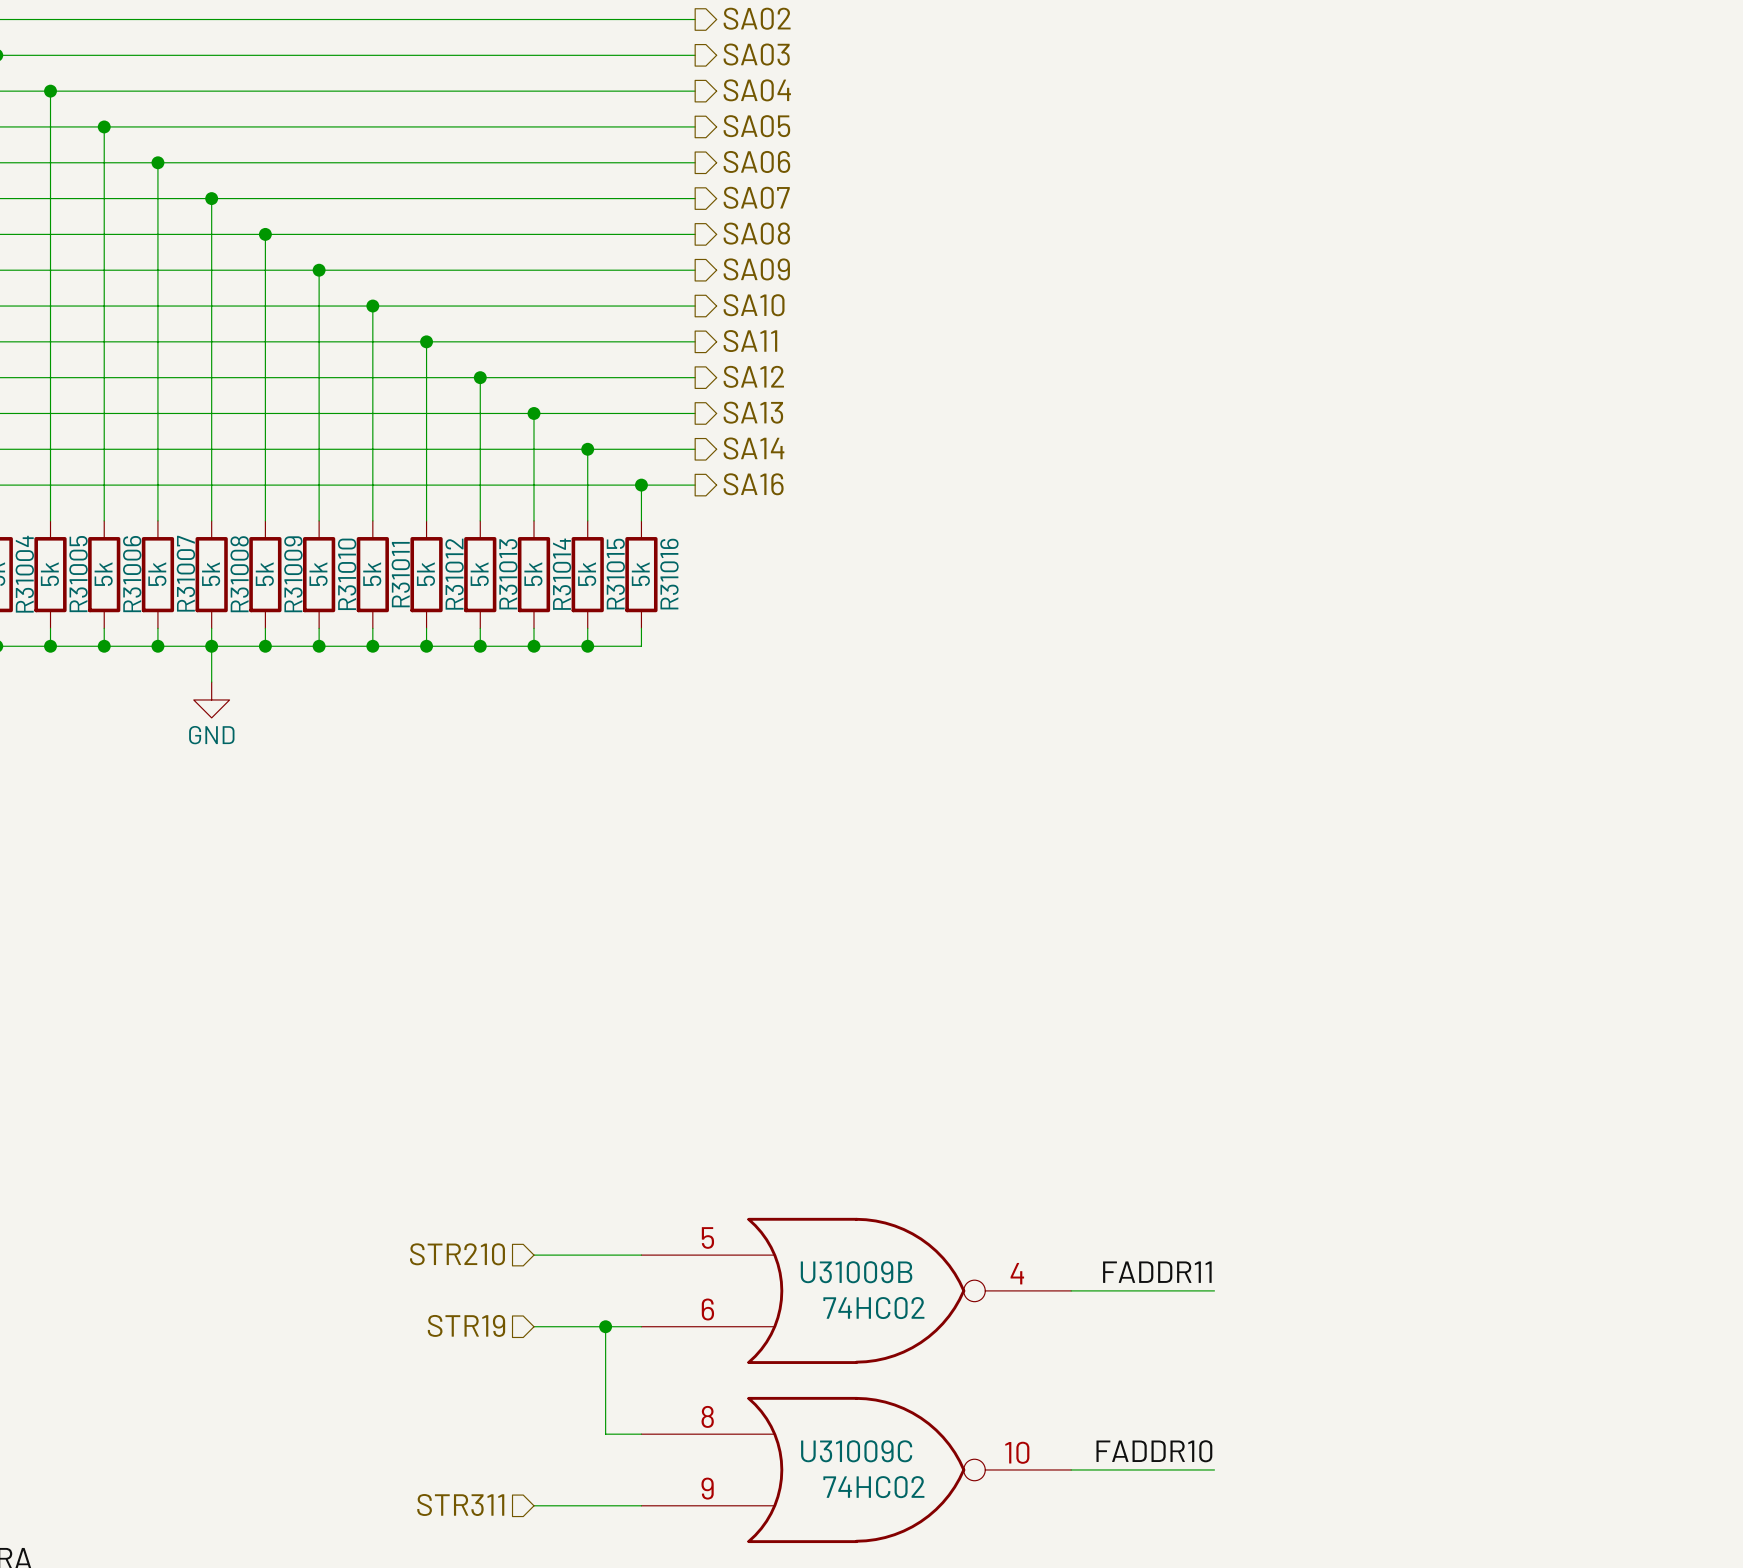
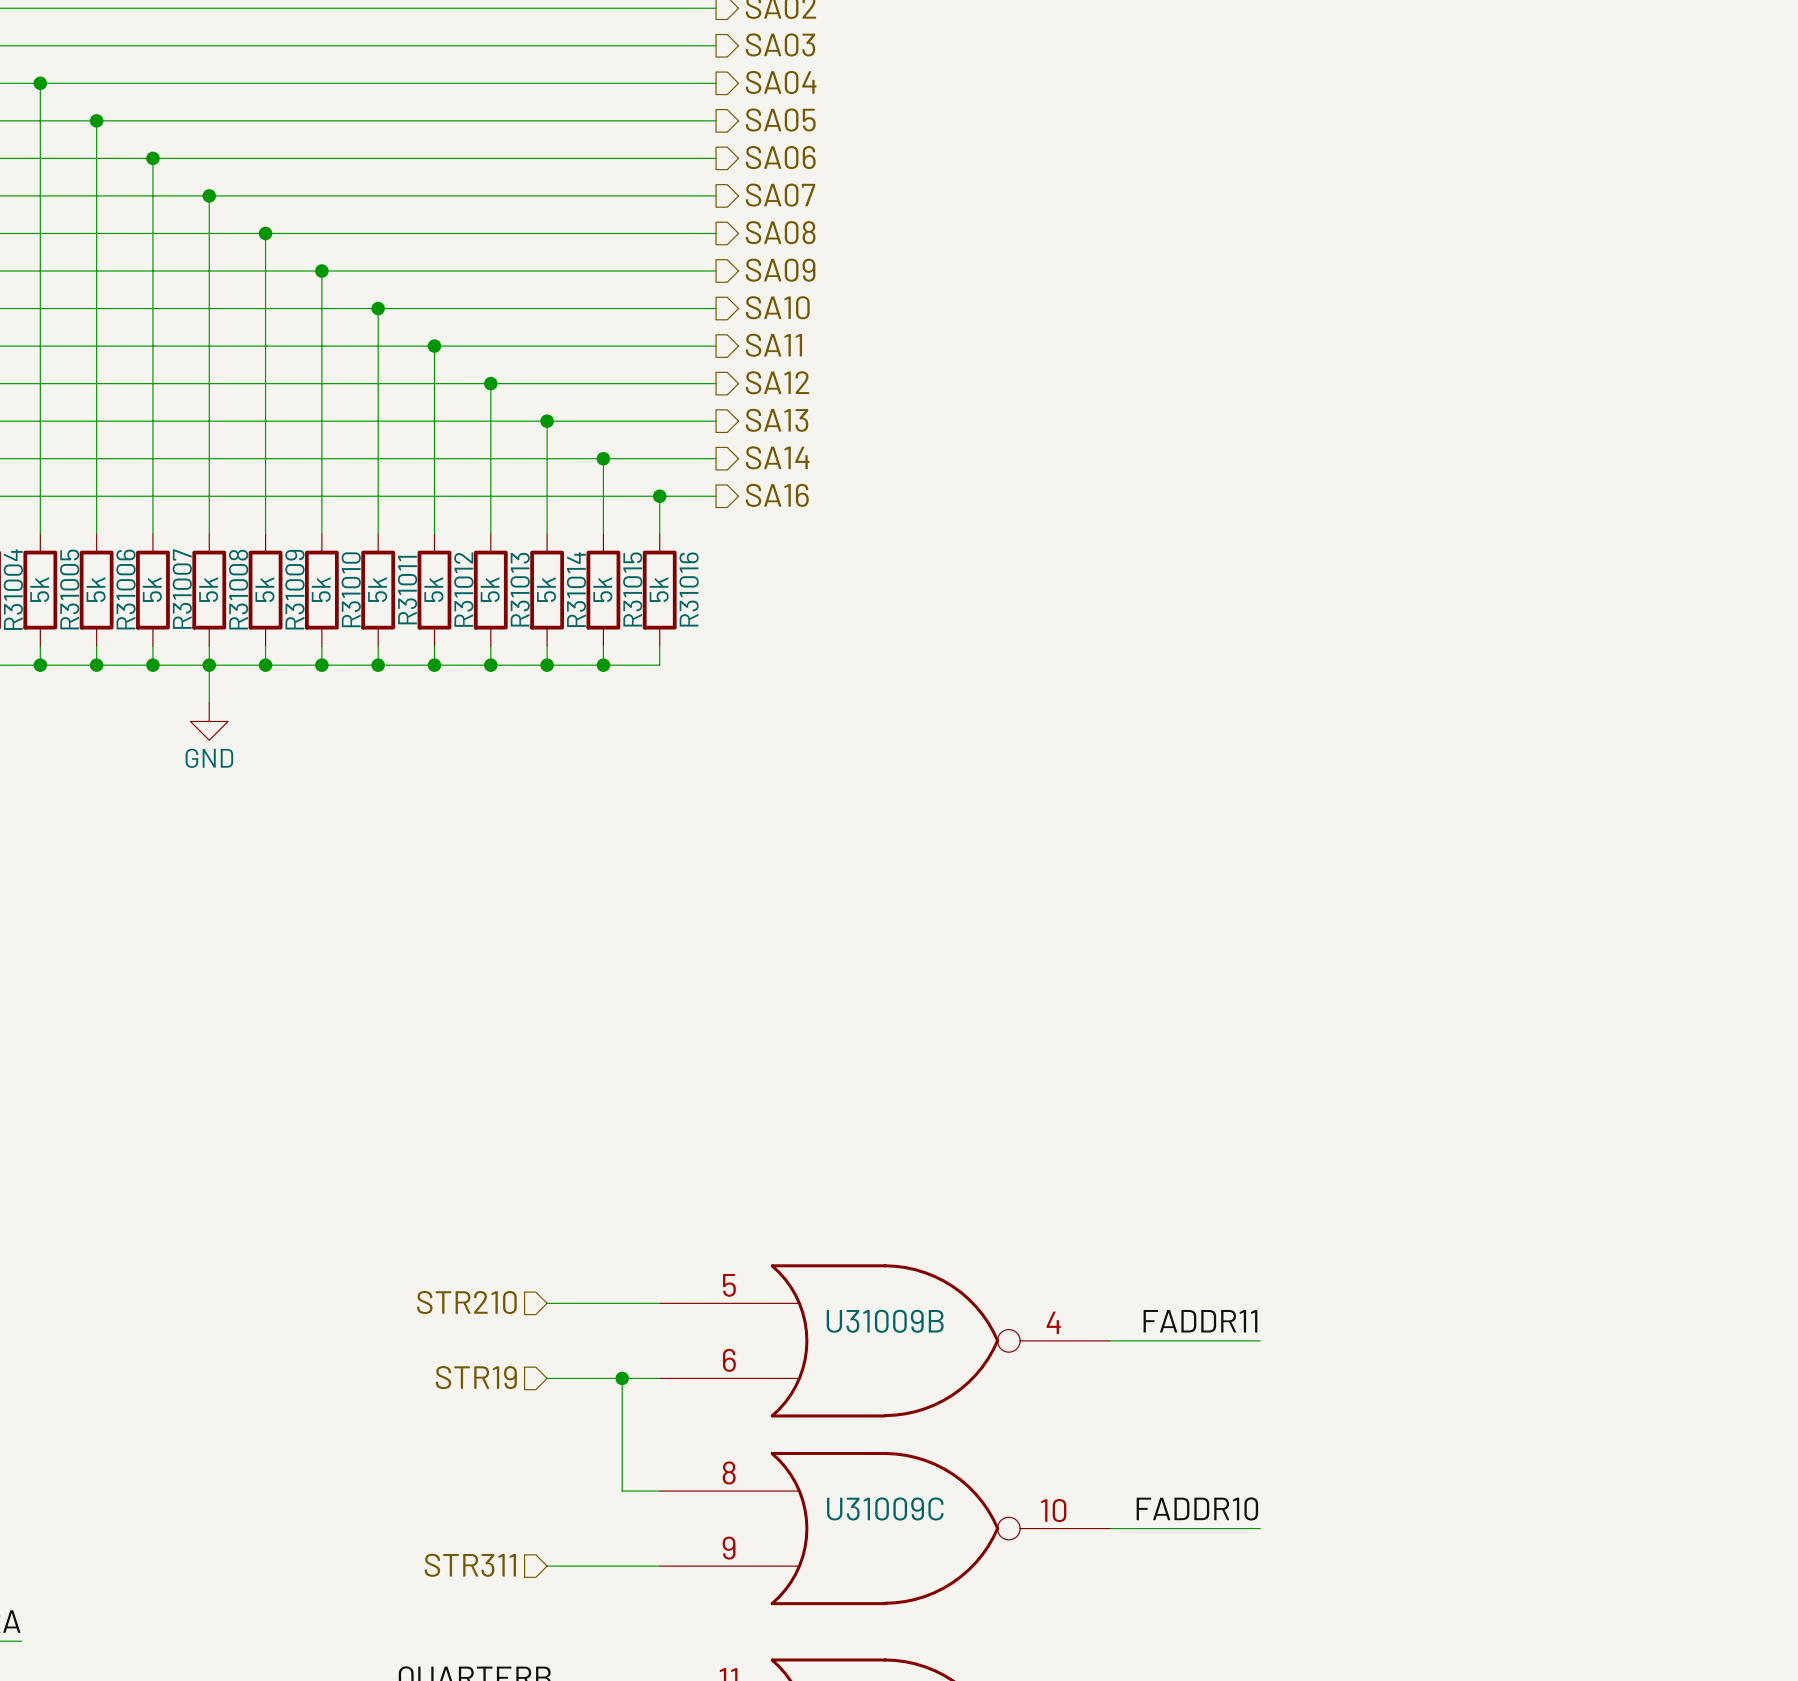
U31009B value: 74HC02 (873, 1308) -> none
U31009C value: 74HC02 (873, 1487) -> none

